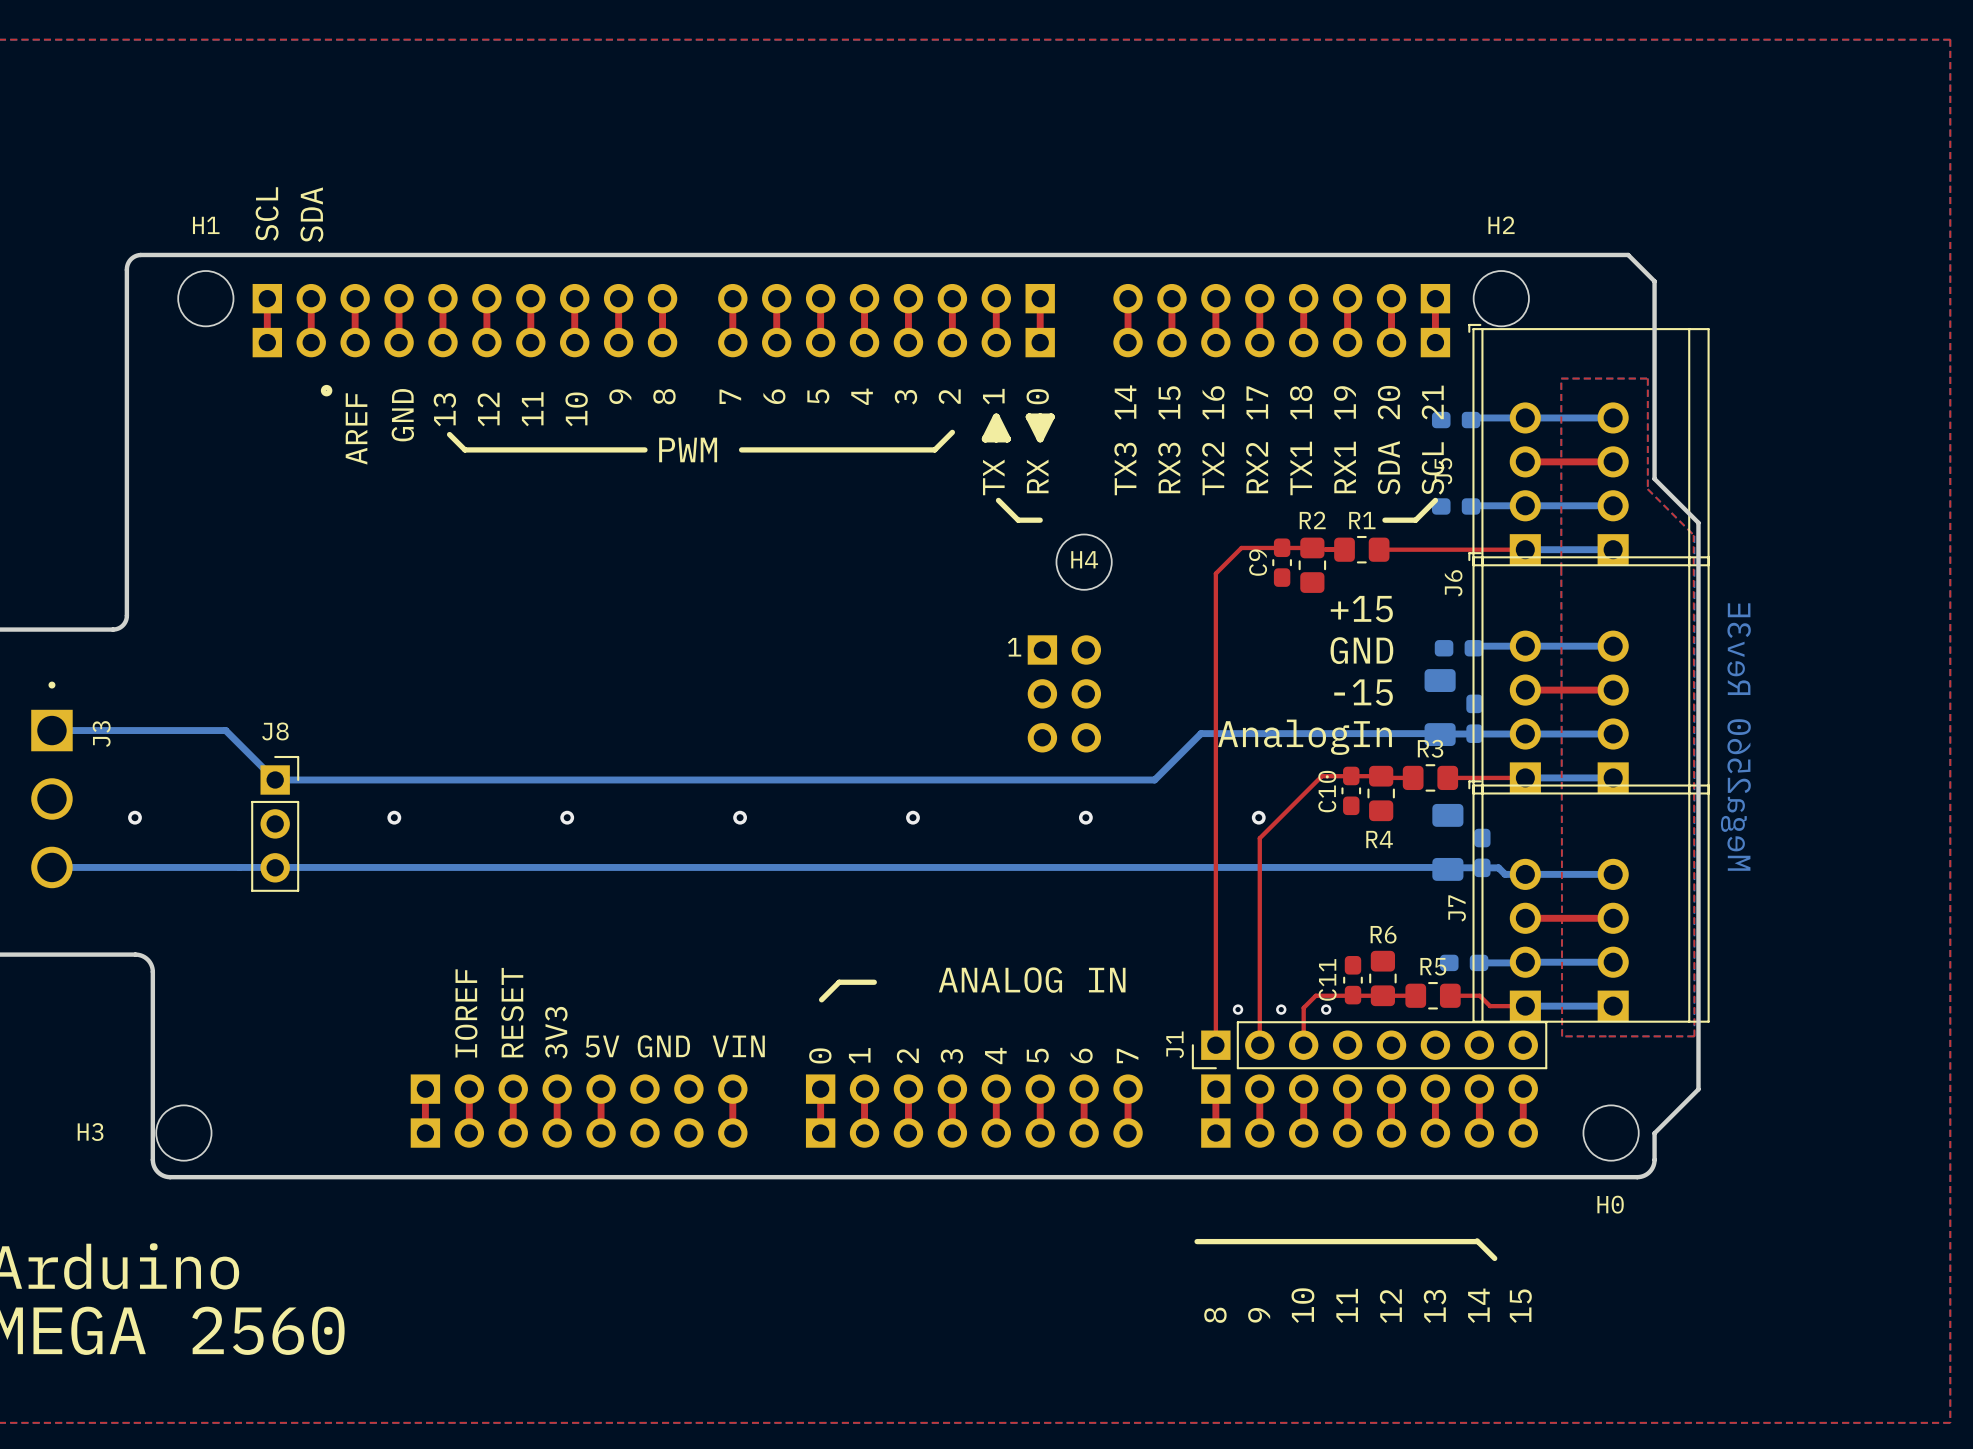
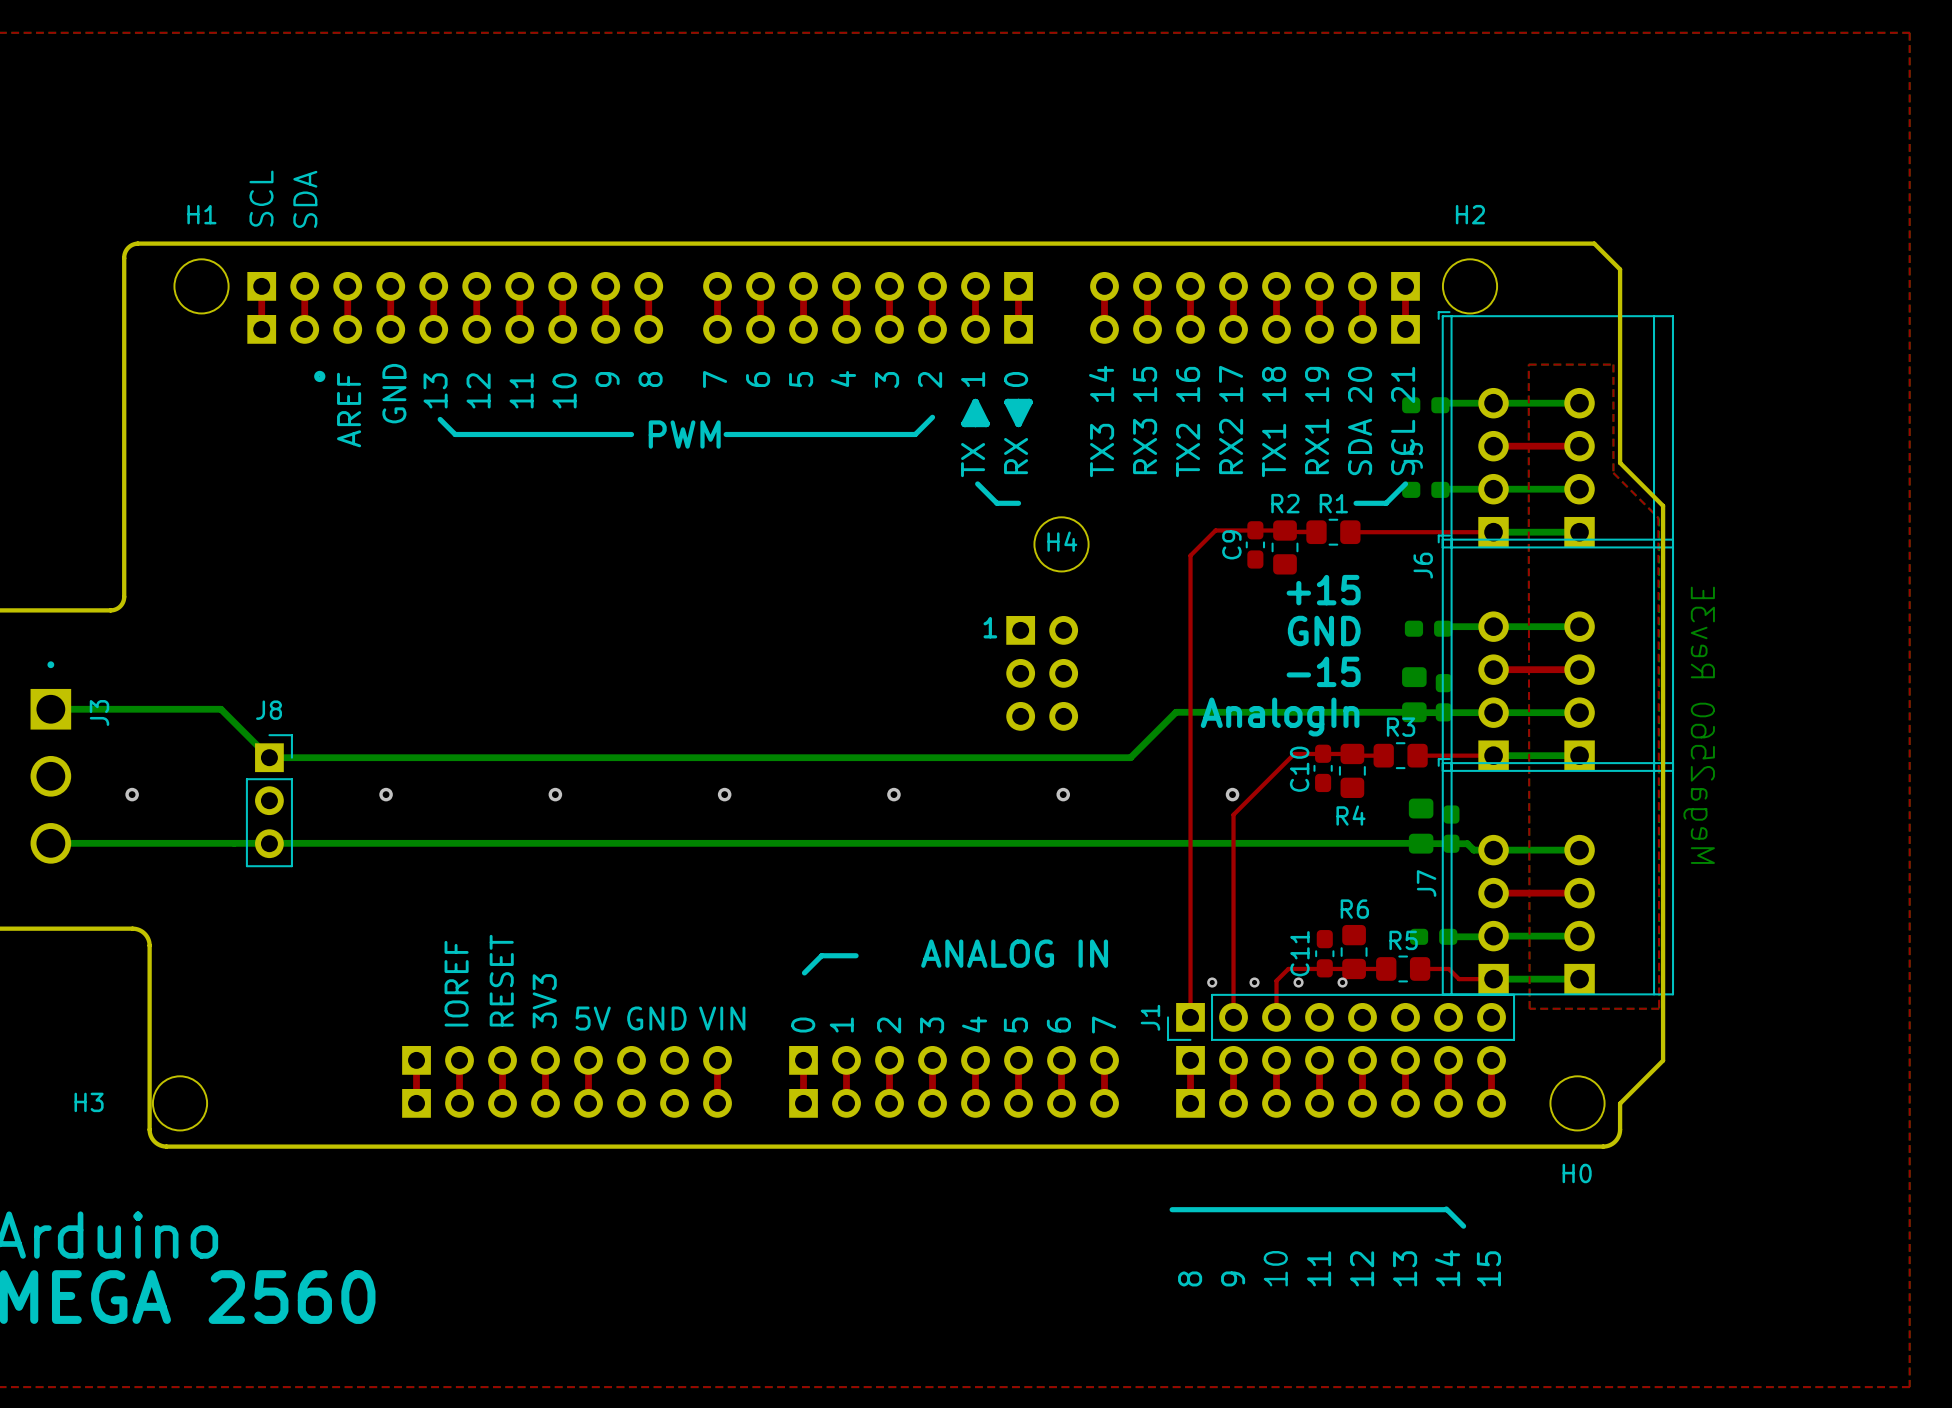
part footprint: [1424, 669, 1456, 747] -> [1402, 667, 1427, 723]
part footprint: [1432, 803, 1464, 881] -> [1408, 798, 1434, 854]
via: none -> (1342, 982)

